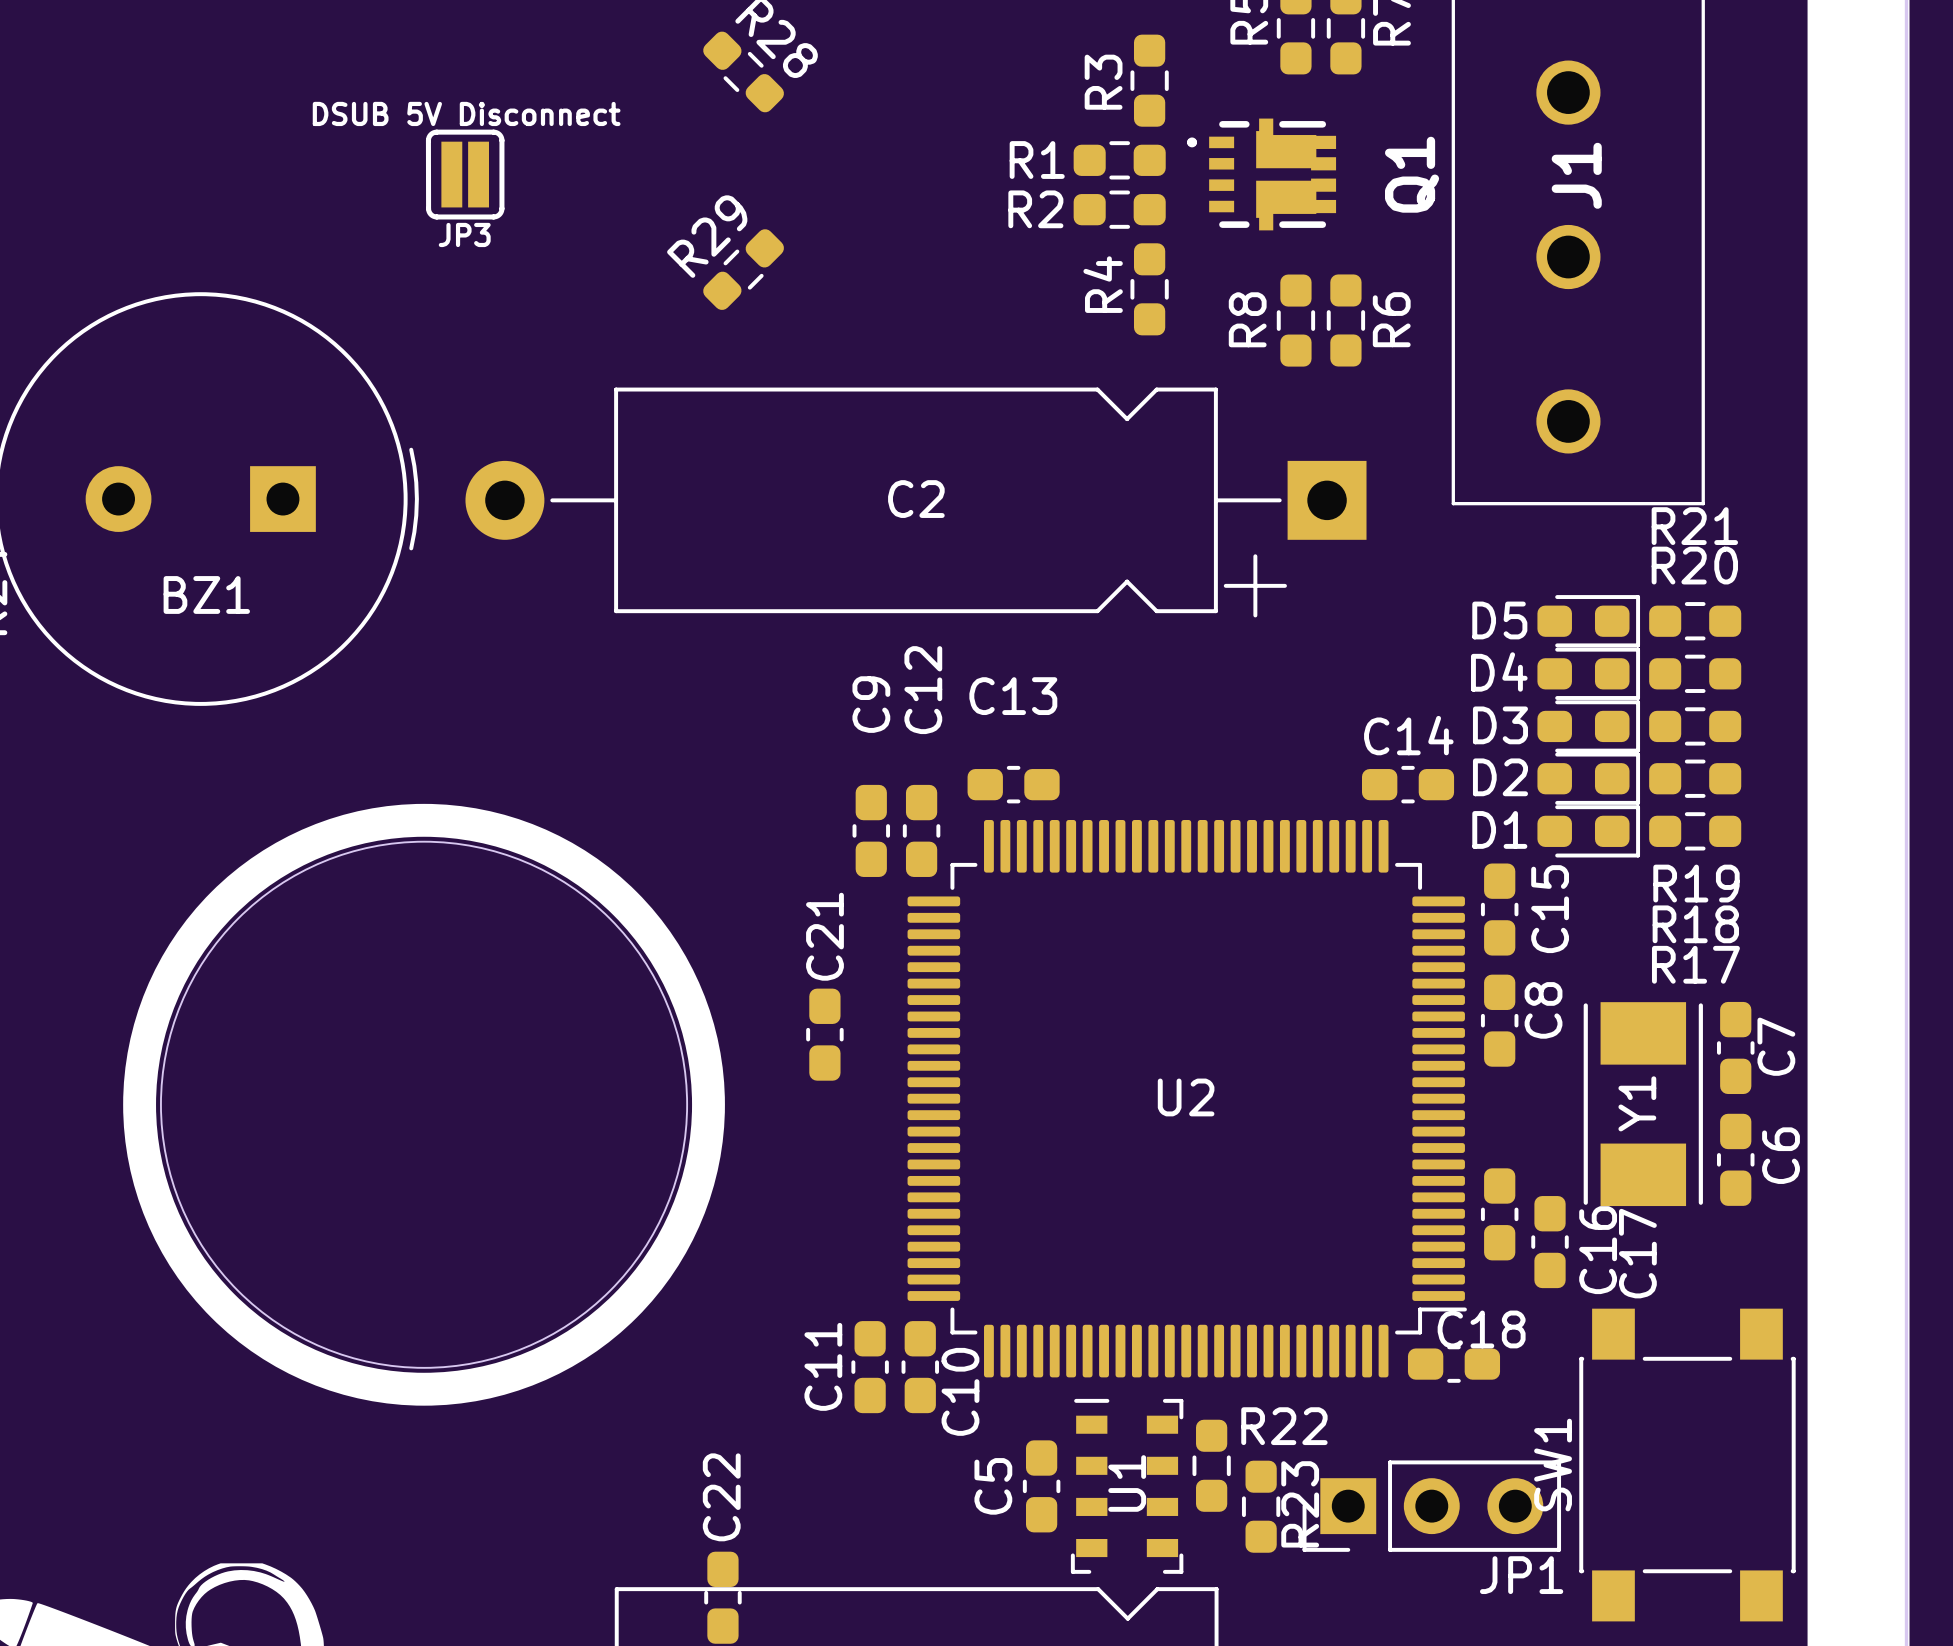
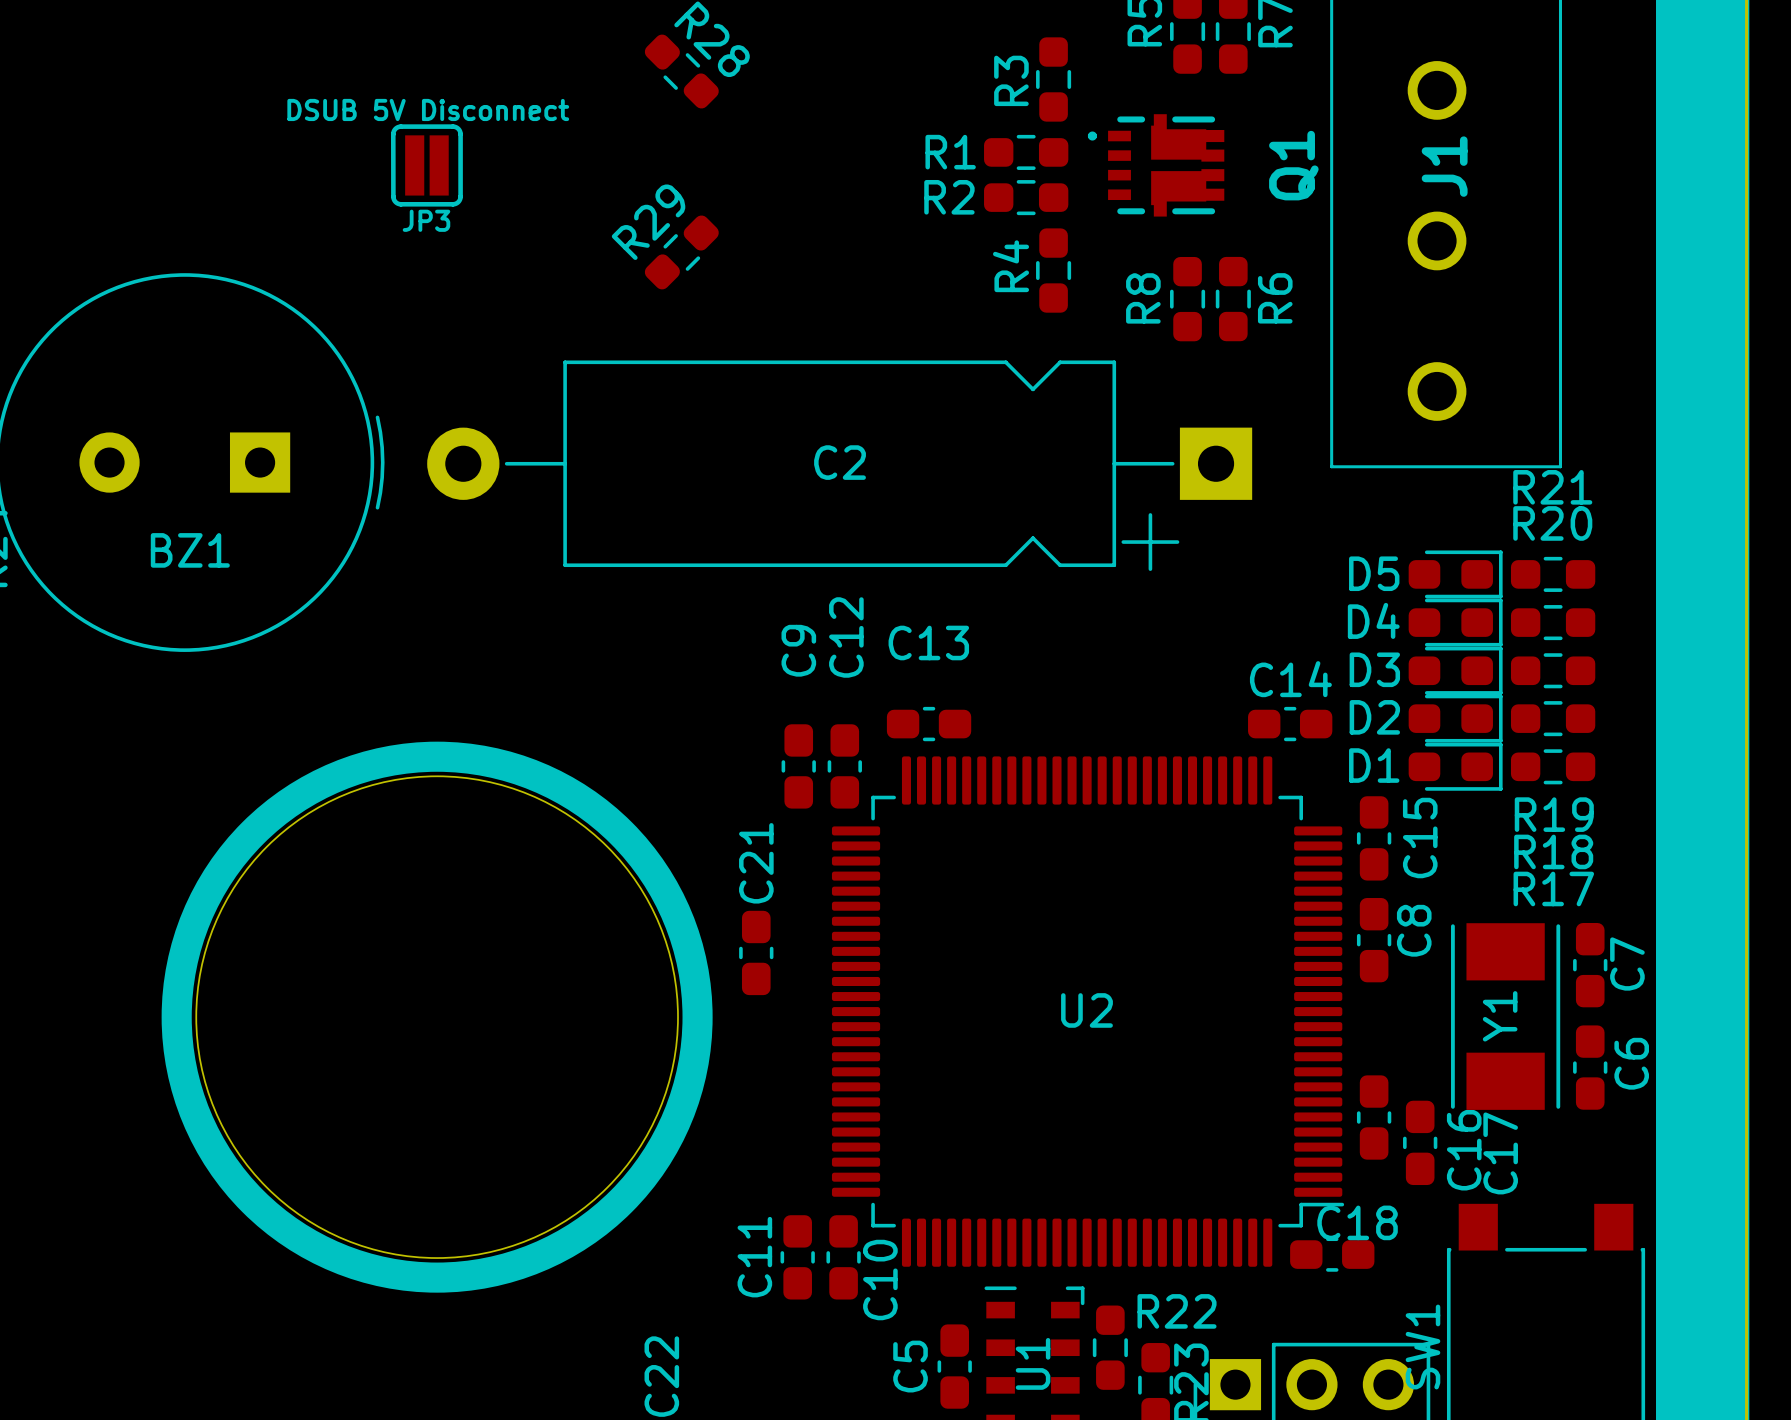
drawing position: (424, 1104) -> (437, 1017)
round board edge position: (424, 1104) -> (437, 1017)

